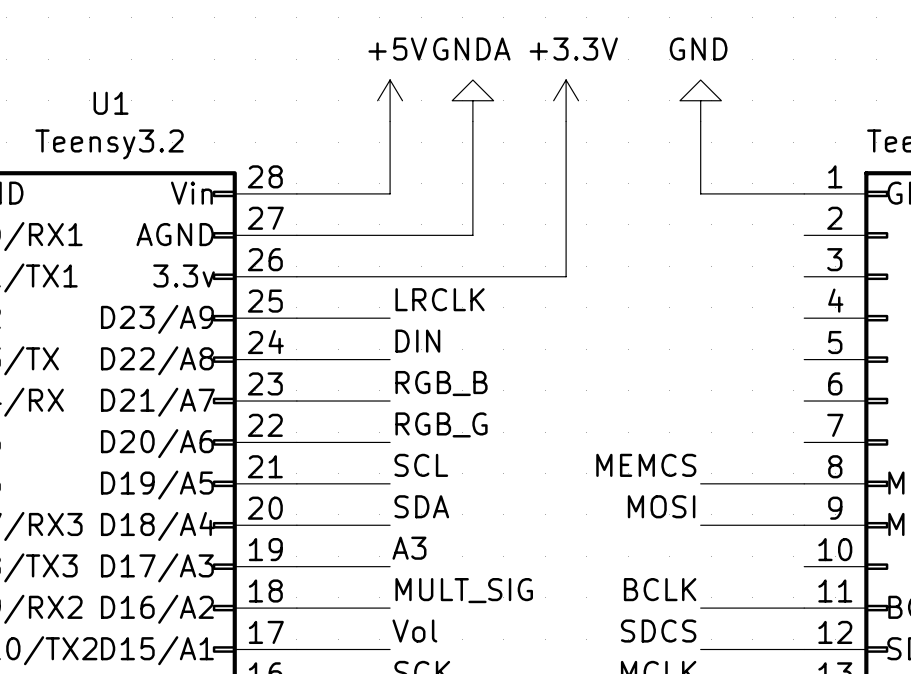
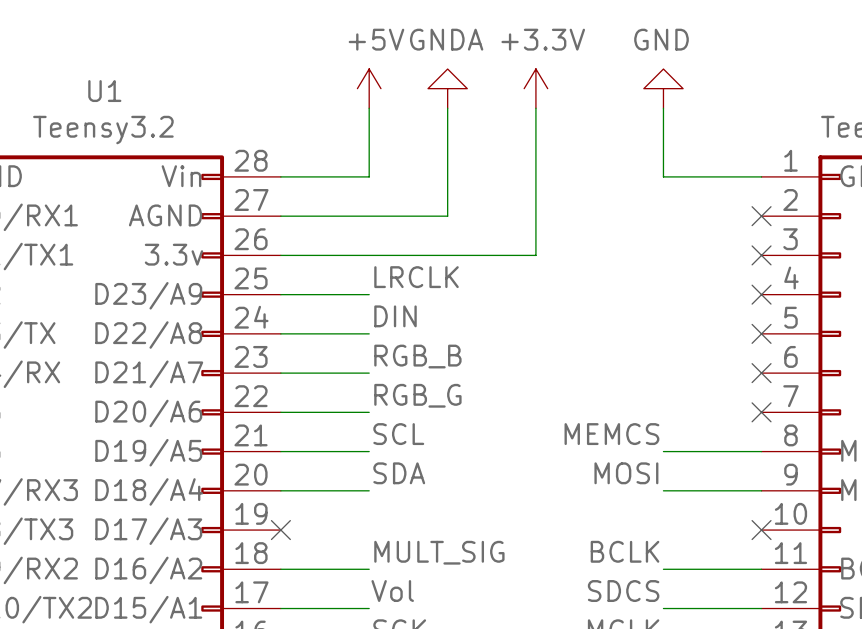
no-connect mark: none -> (761, 216)
no-connect mark: none -> (761, 255)
no-connect mark: none -> (761, 294)
no-connect mark: none -> (761, 333)
no-connect mark: none -> (761, 373)
no-connect mark: none -> (761, 412)
label: A3 (409, 548) -> none
wire: (296, 566) (390, 566) -> none
no-connect mark: none -> (280, 530)
no-connect mark: none -> (761, 530)

